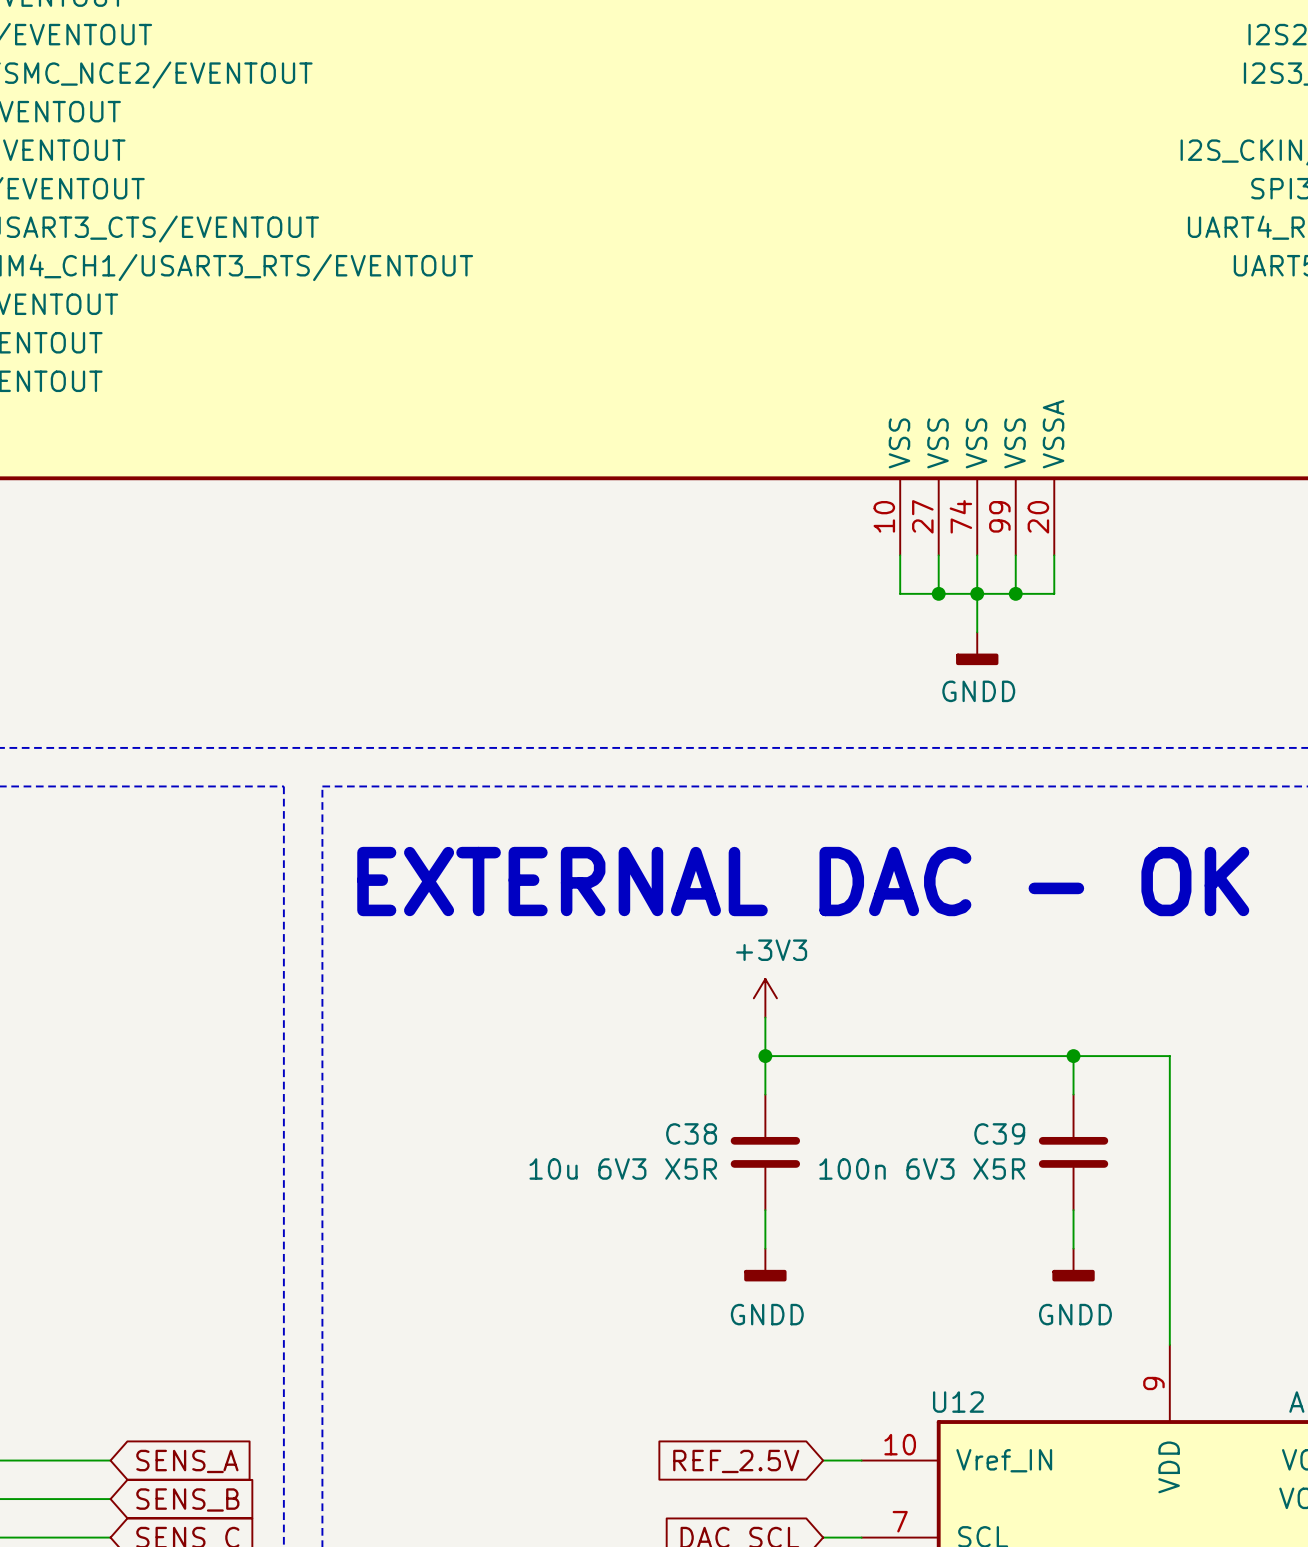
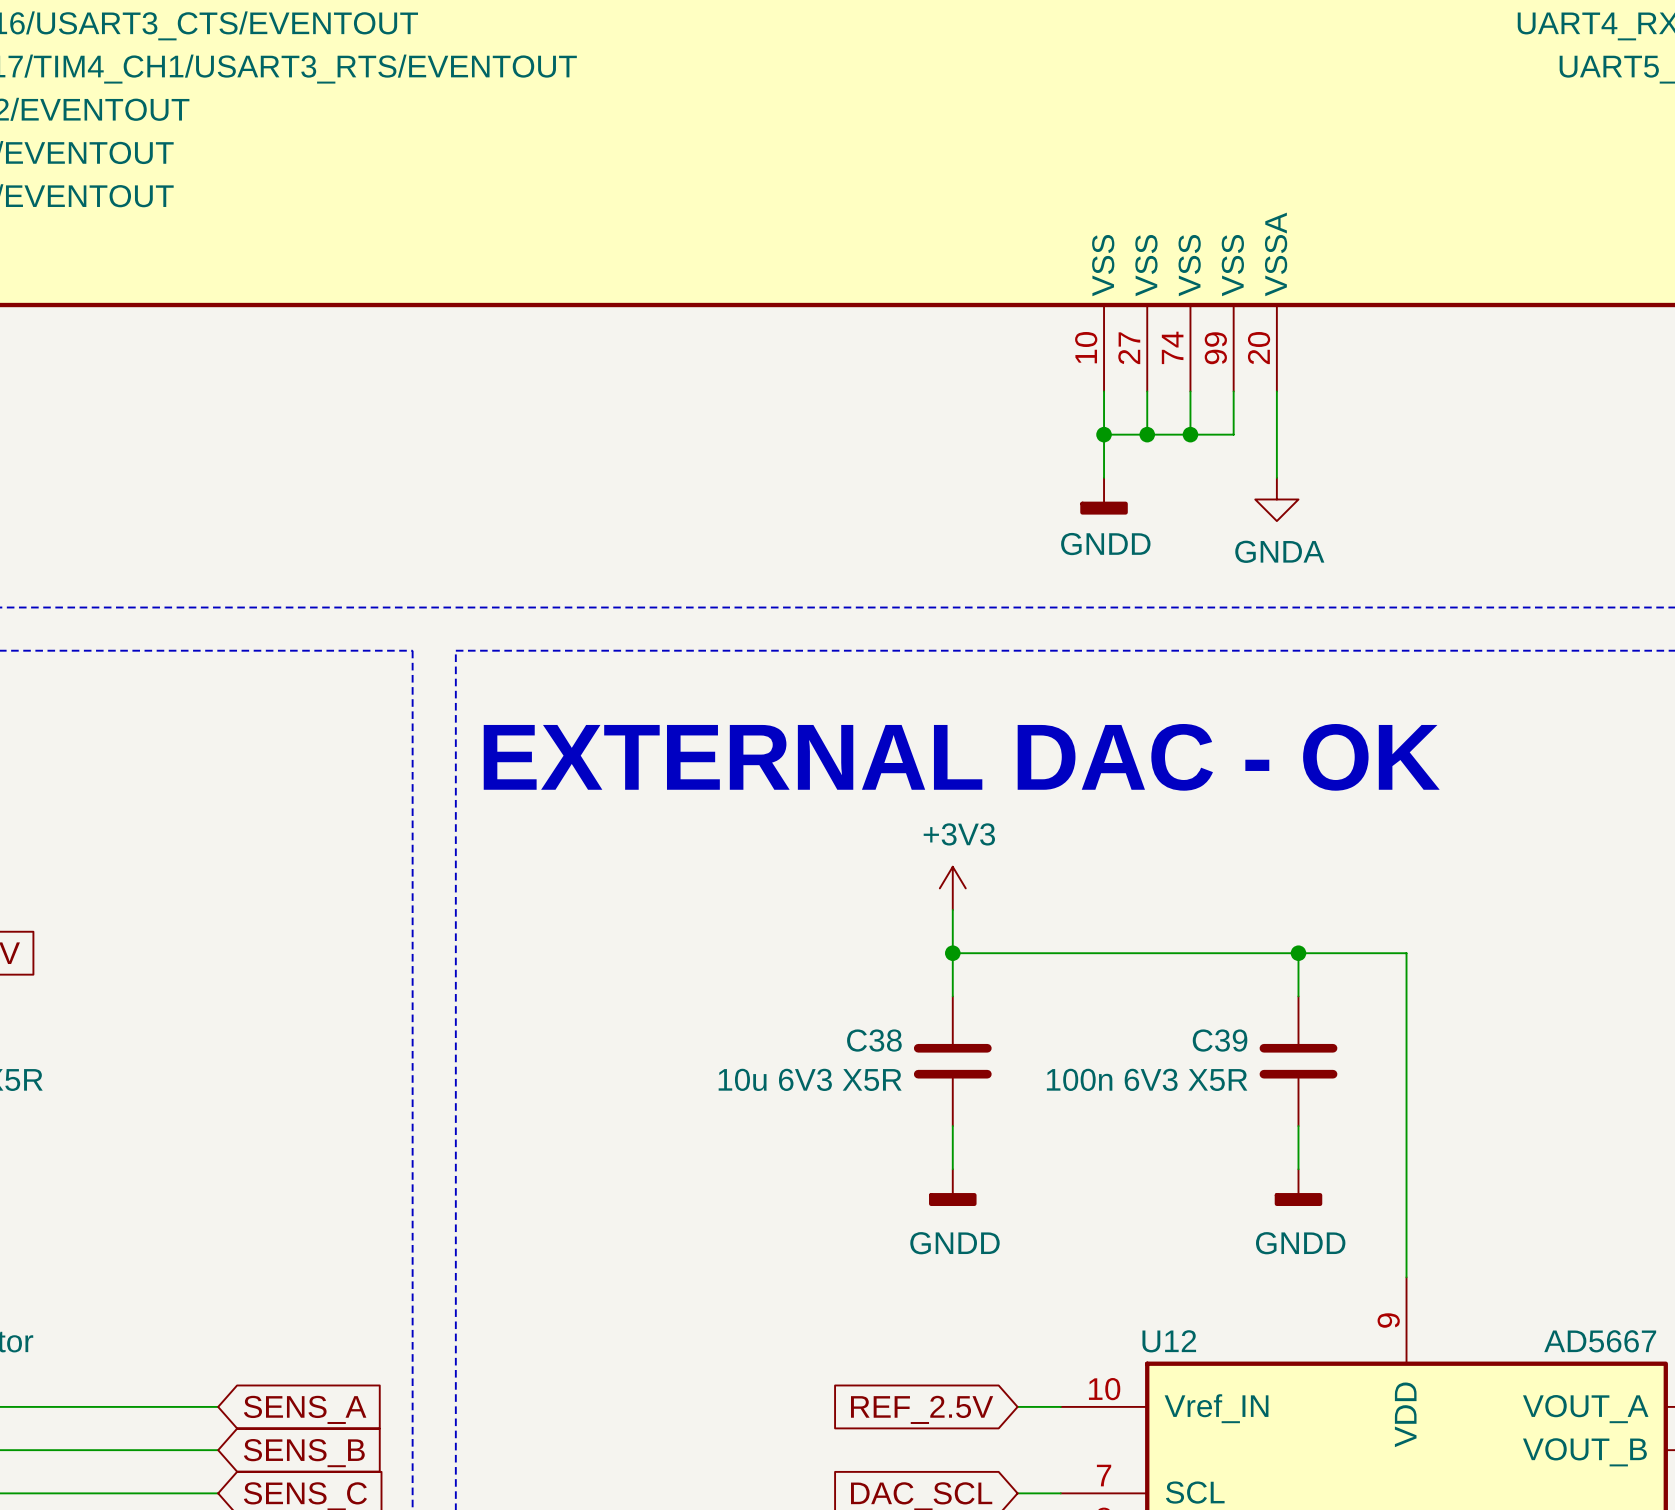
junction: none -> (1104, 434)
wire: (977, 593) (977, 632) -> (1104, 434) (1104, 477)
wire: (1015, 593) (1054, 593) -> (1276, 477) (1276, 434)
junction: (1015, 593) -> none
power symbol position: GNDD (977, 648) -> GNDD (1104, 496)
power symbol: none -> GNDA (1276, 499)

